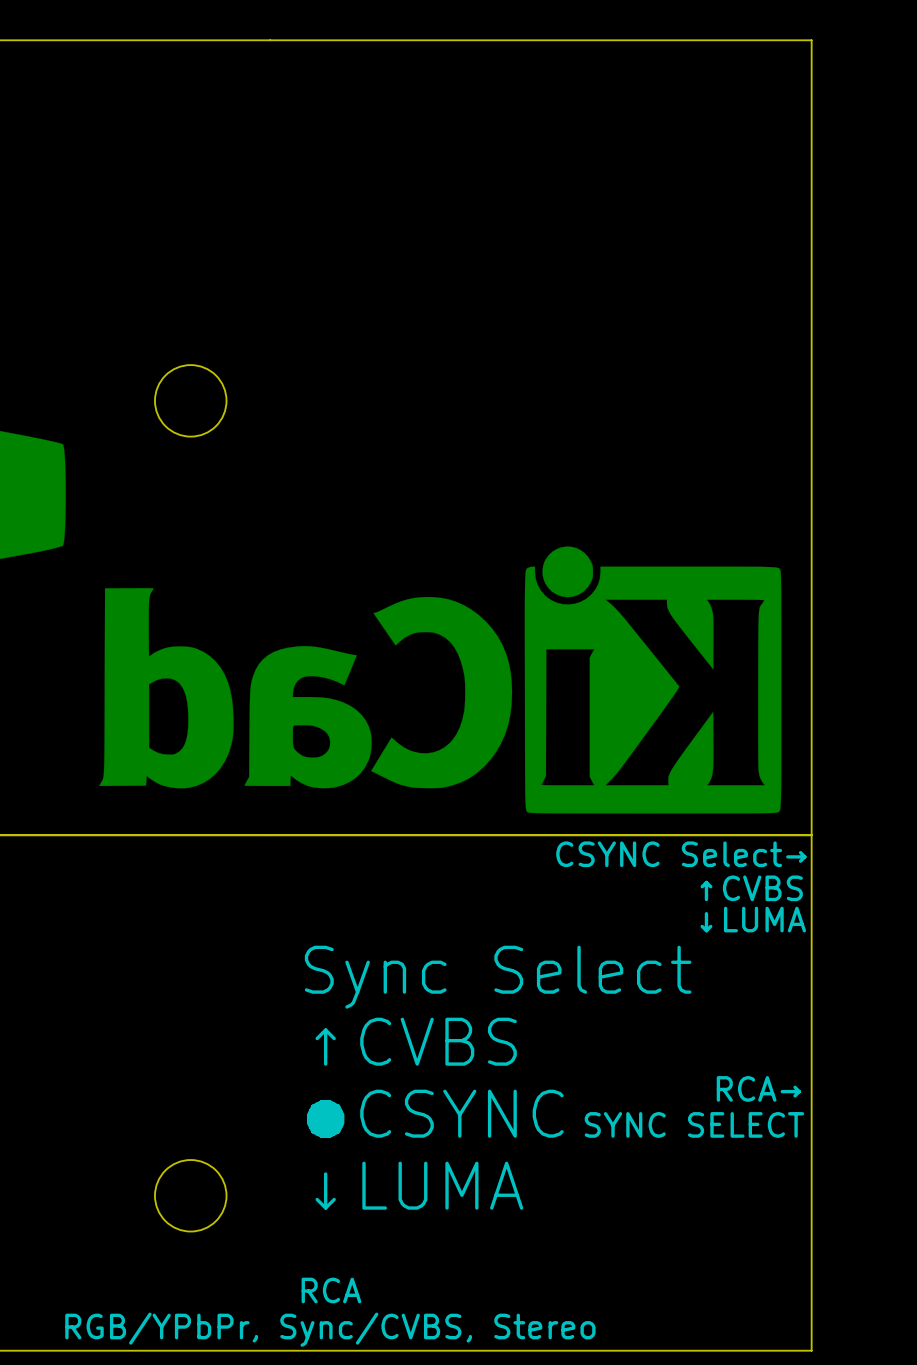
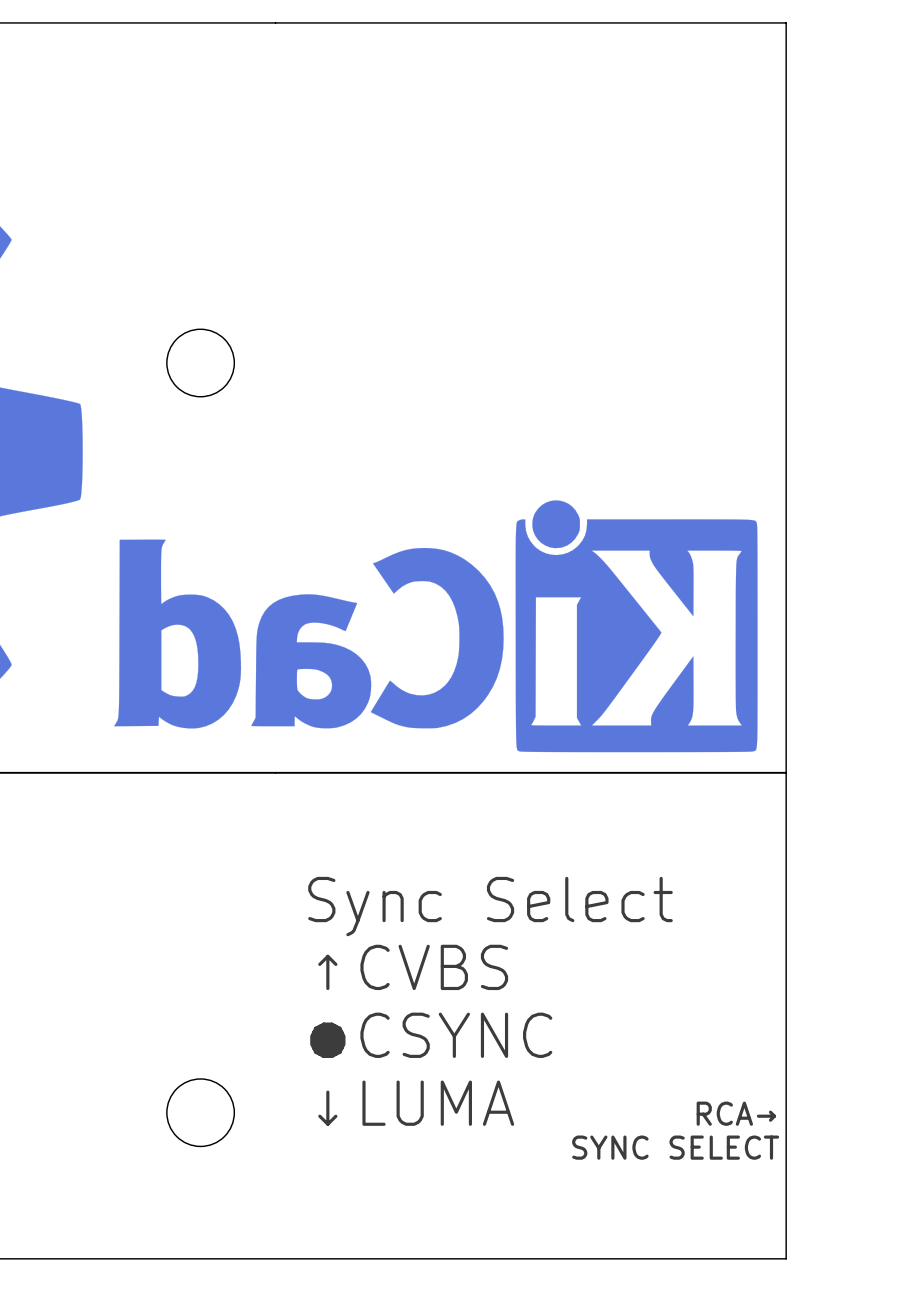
text: CSYNC Select→ (681, 854) -> none
text: ↑CVBS (751, 888) -> none
text: ↓LUMA (753, 919) -> none
text position: RCA→ (758, 1088) -> RCA→ (736, 1113)
text position: SYNC SELECT (694, 1124) -> SYNC SELECT (675, 1147)
text: RCA (331, 1290) -> none
text: RGB/YPbPr, Sync/CVBS, Stereo (330, 1329) -> none

